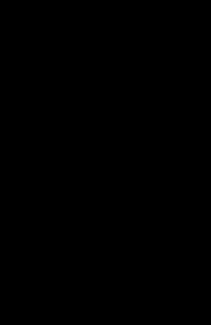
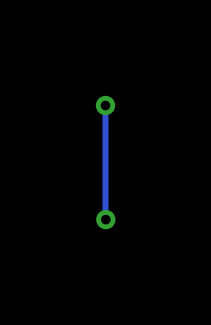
track: none -> (105, 105) (105, 219)
via: none -> (105, 105)
via: none -> (105, 219)

